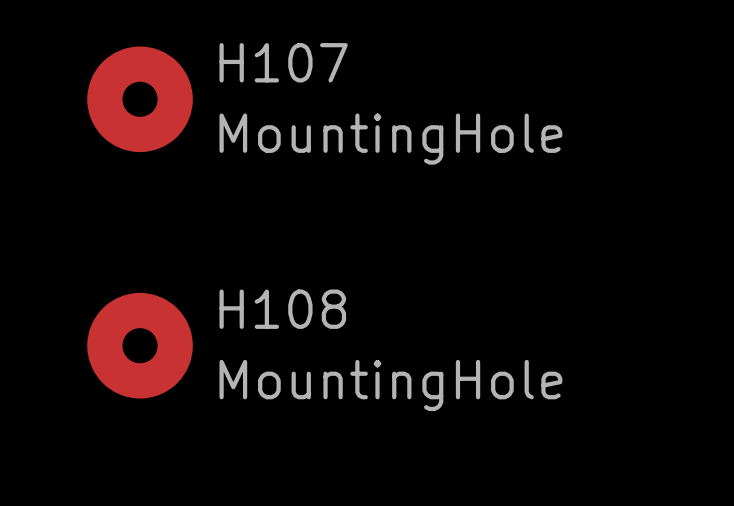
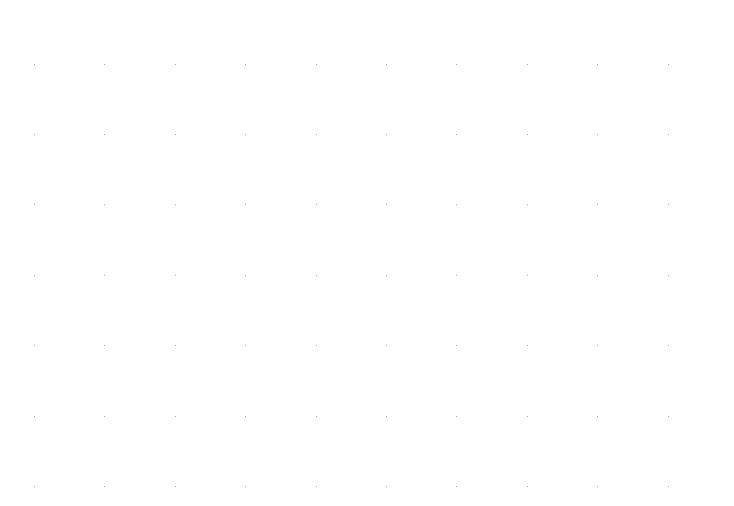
H107: MountingHole (140, 99) -> none
H108: MountingHole (140, 345) -> none

